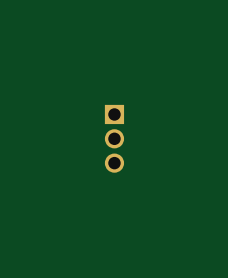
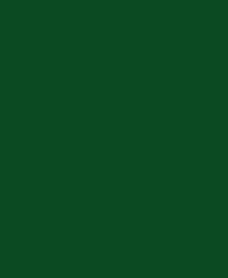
part: (114, 138) -> none

